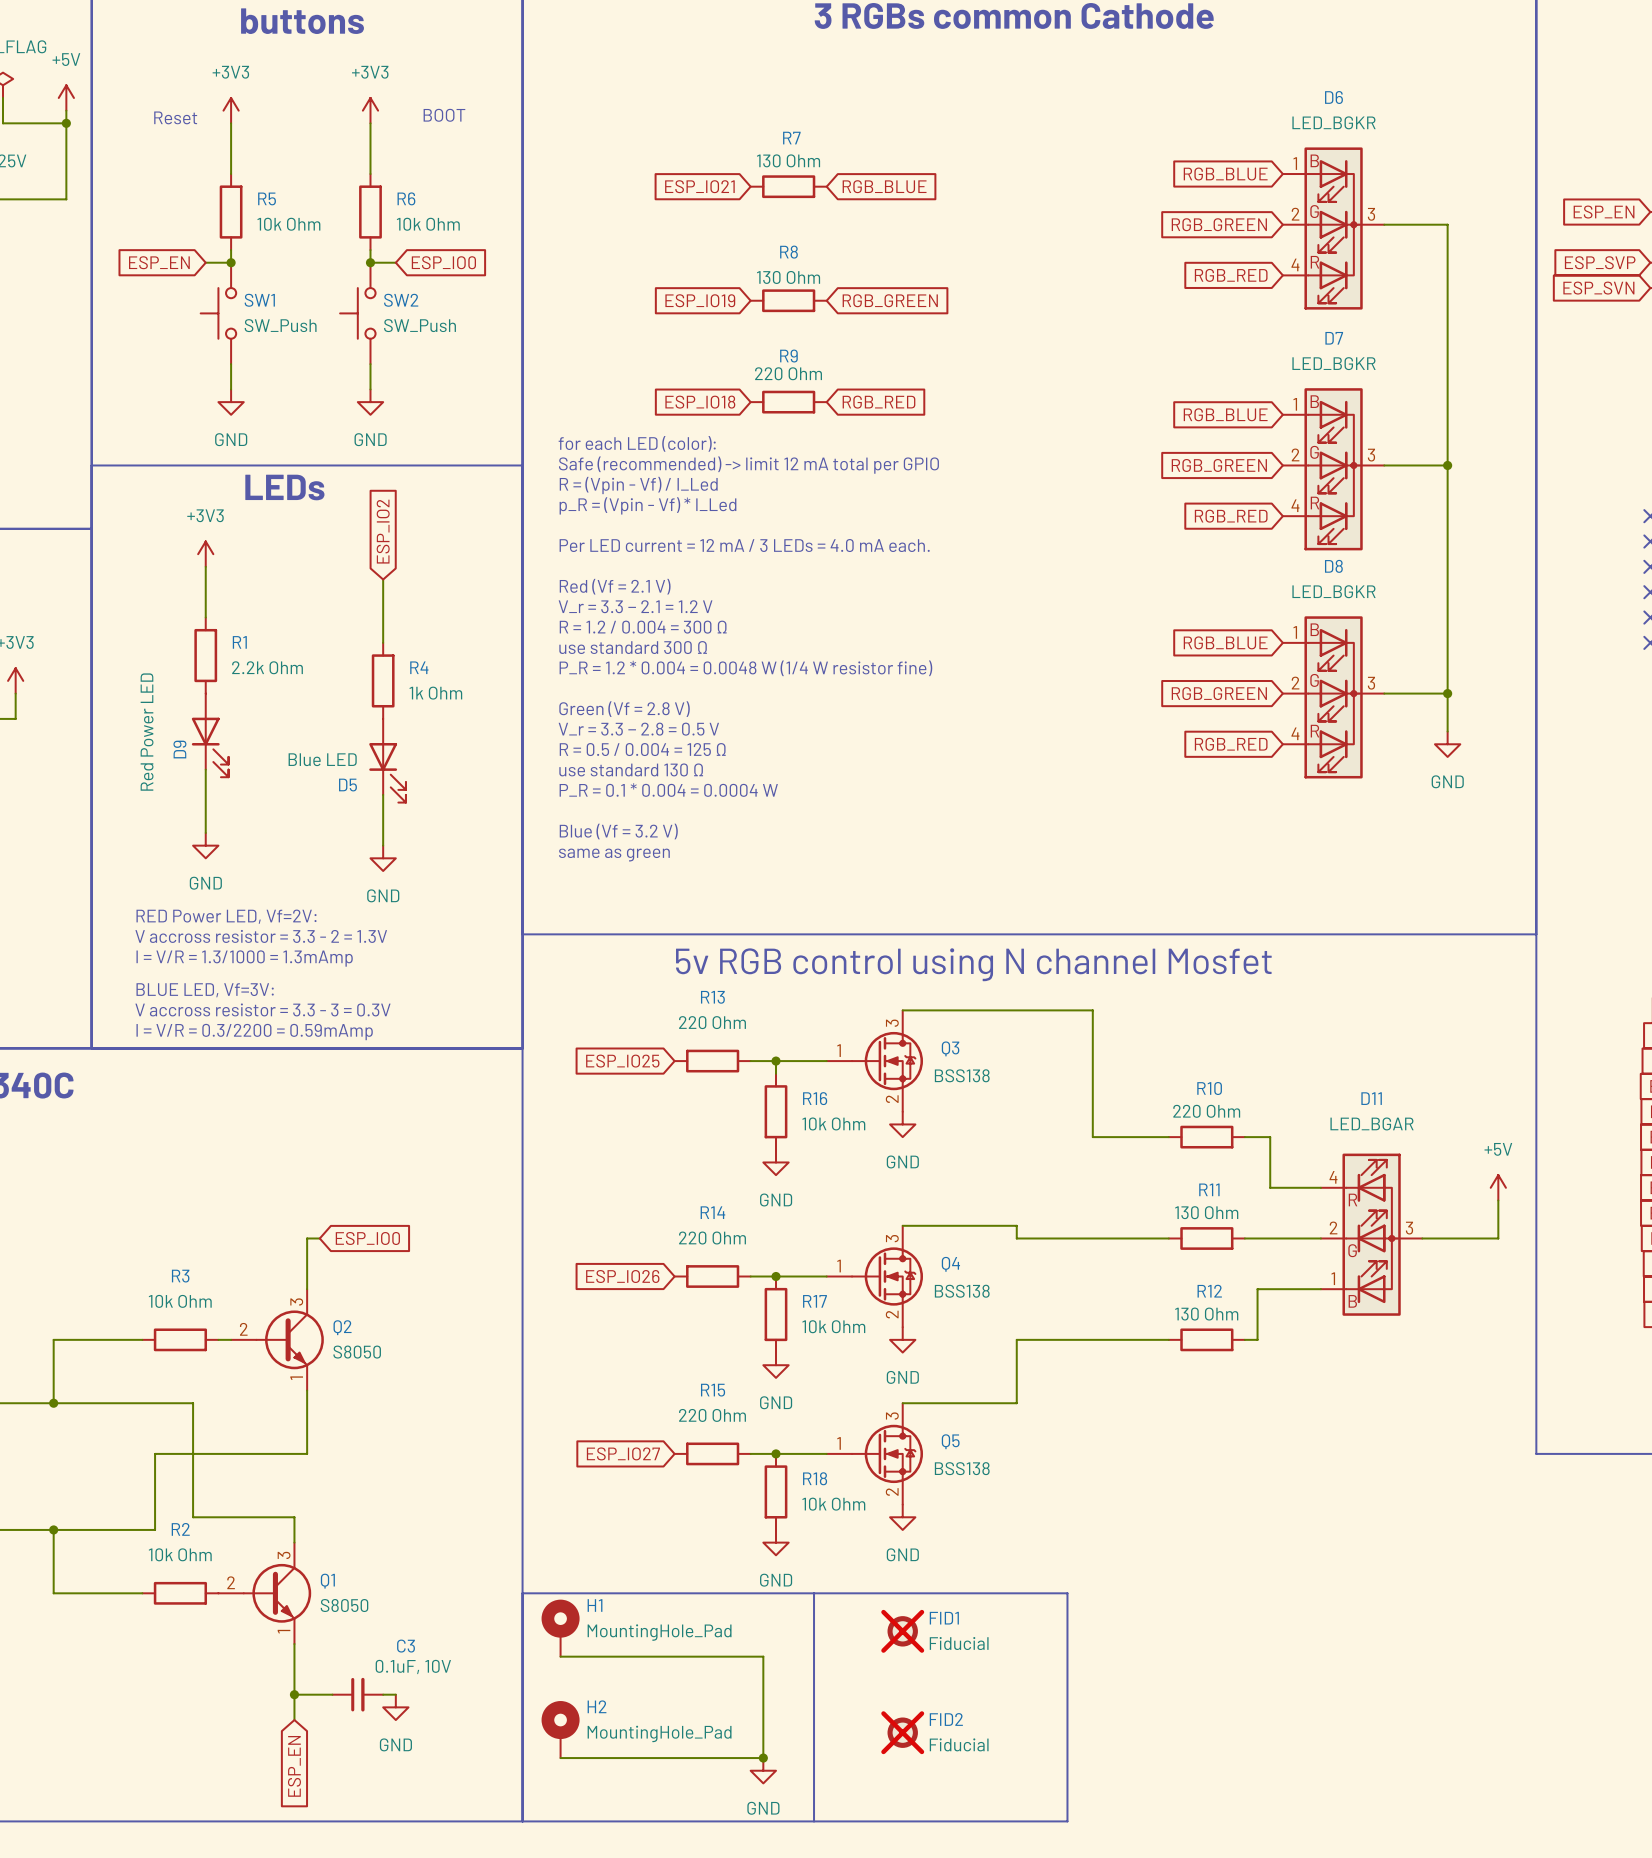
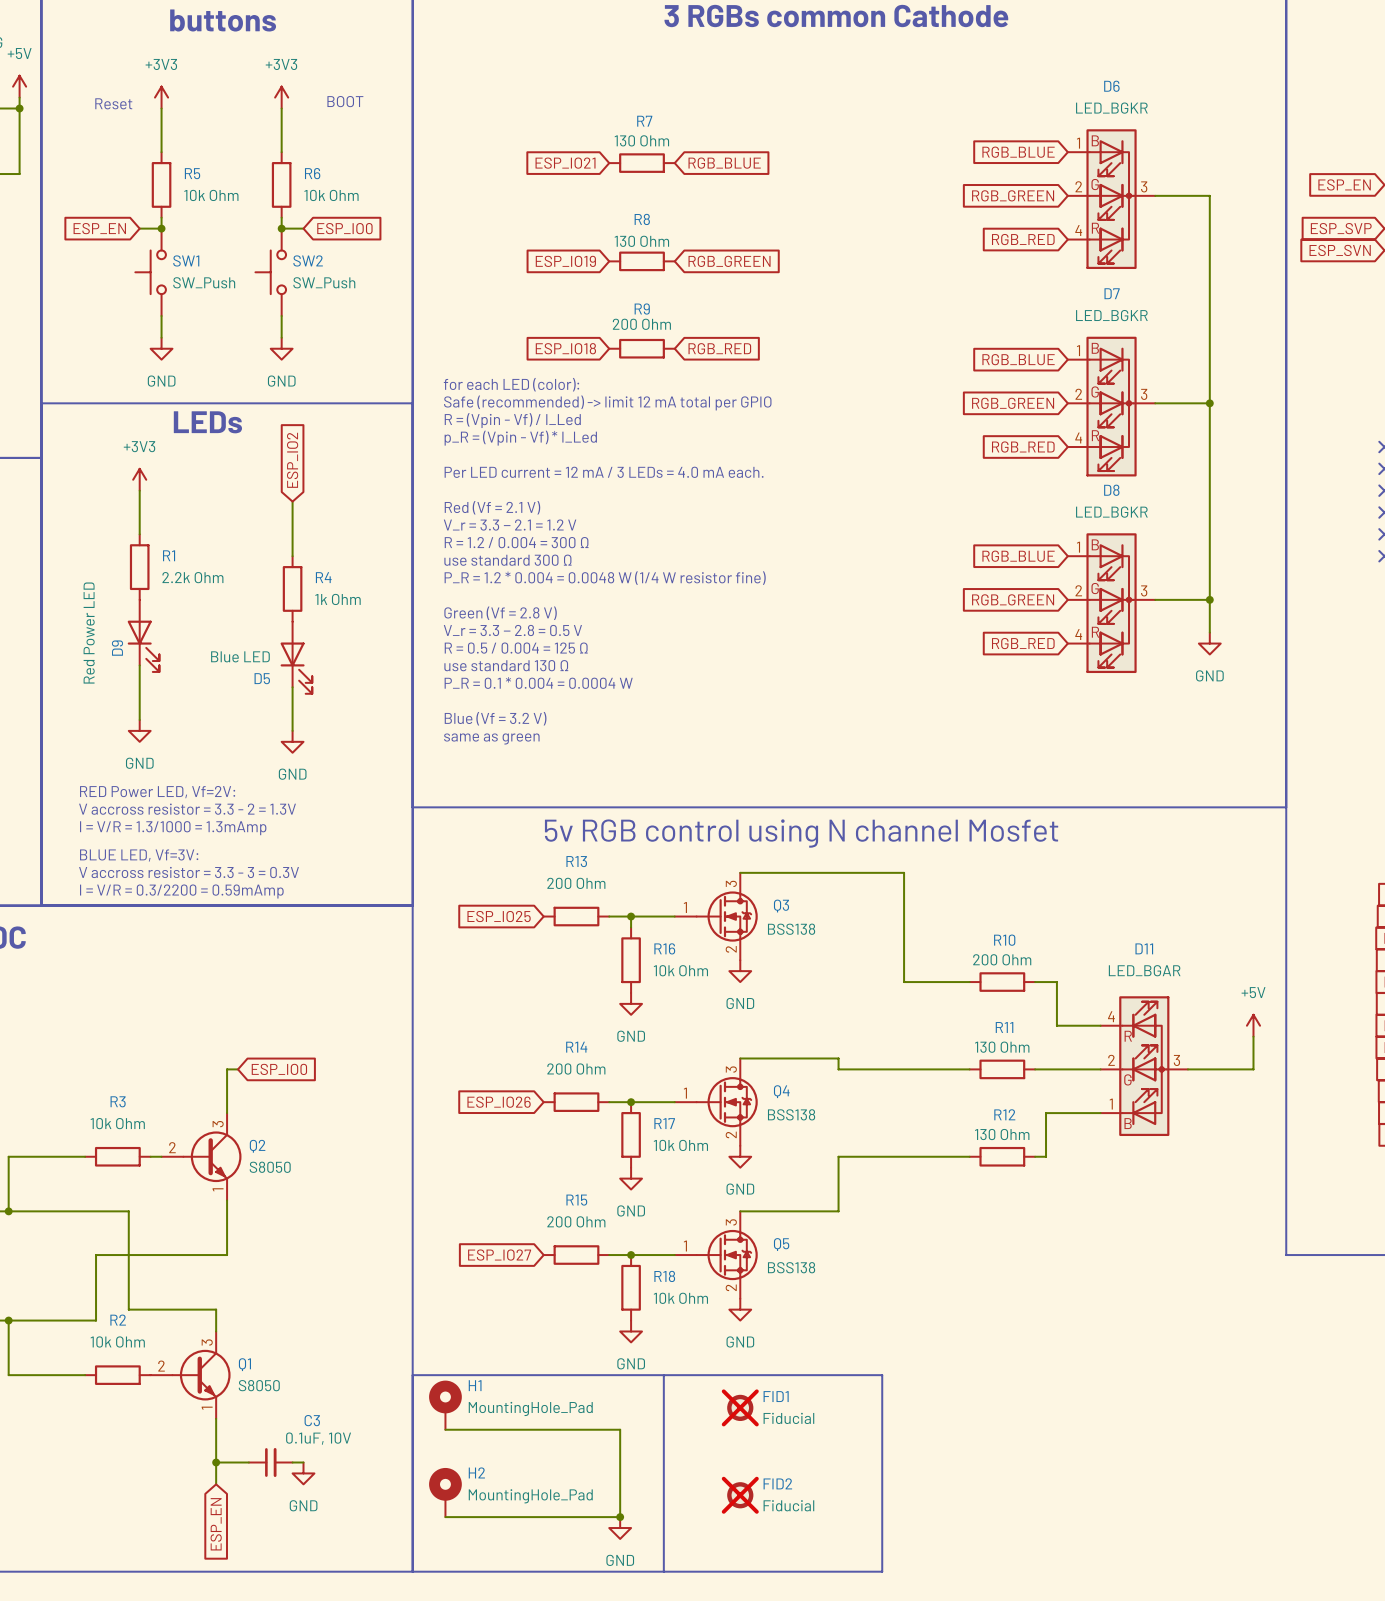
R9 value: 220 Ohm (788, 373) -> 200 Ohm (641, 324)
R13 value: 220 Ohm (712, 1022) -> 200 Ohm (576, 883)
R10 value: 220 Ohm (1206, 1111) -> 200 Ohm (1002, 959)
R14 value: 220 Ohm (712, 1238) -> 200 Ohm (576, 1069)
R15 value: 220 Ohm (712, 1415) -> 200 Ohm (576, 1221)

